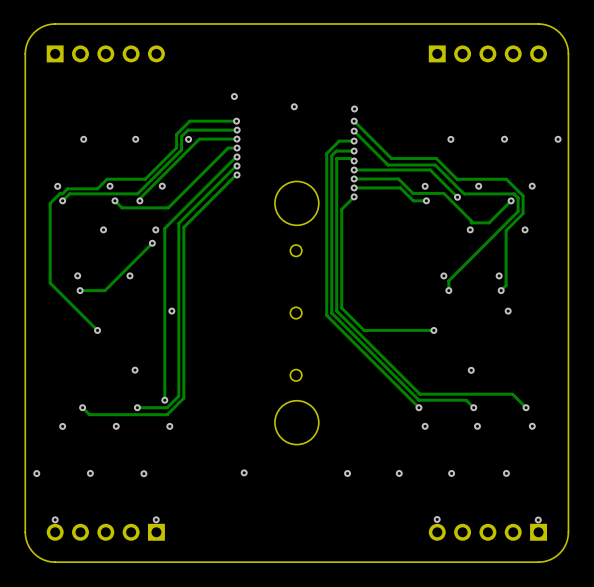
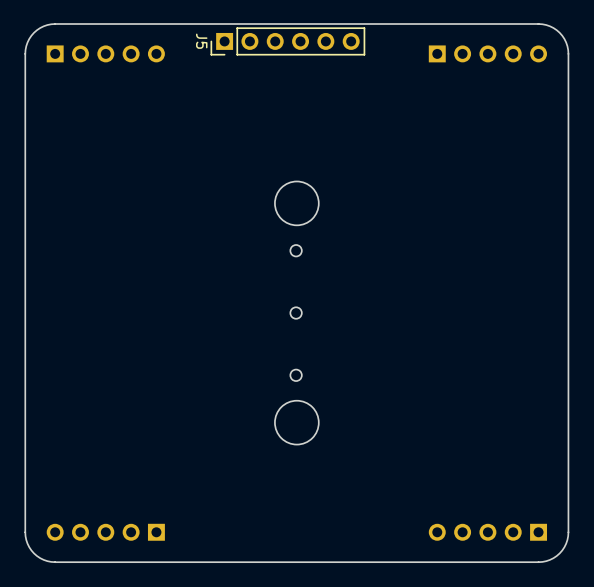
J5: none -> (287, 41)
via: (234, 96) -> none
via: (294, 106) -> none
via: (354, 108) -> none
track: (236, 121) (189, 121) (176, 134) (176, 147) (145, 179) (107, 179) (97, 188) (67, 188) (50, 203) (50, 283) (97, 330) -> none
via: (236, 121) -> none
track: (354, 121) (391, 158) (436, 158) (457, 179) (506, 179) (523, 195) (523, 213) (506, 230) (506, 285) (501, 290) -> none
via: (354, 121) -> none
track: (237, 130) (187, 130) (181, 136) (181, 149) (137, 193) (69, 193) (62, 200) -> none
via: (237, 130) -> none
track: (354, 131) (388, 165) (435, 165) (464, 193) (514, 193) (518, 198) (518, 211) (448, 280) (448, 290) -> none
via: (354, 131) -> none
via: (83, 139) -> none
via: (135, 139) -> none
via: (188, 139) -> none
track: (237, 139) (199, 139) (139, 198) (139, 200) -> none
via: (237, 139) -> none
via: (450, 139) -> none
via: (504, 139) -> none
via: (558, 139) -> none
track: (354, 141) (339, 141) (326, 153) (326, 315) (418, 407) -> none
via: (354, 141) -> none
track: (237, 148) (228, 148) (168, 207) (122, 207) (114, 200) -> none
via: (237, 148) -> none
track: (354, 151) (336, 151) (331, 155) (331, 313) (418, 400) (466, 400) (473, 407) -> none
via: (354, 151) -> none
track: (237, 157) (164, 228) (164, 400) -> none
via: (237, 157) -> none
track: (354, 161) (350, 158) (336, 158) (336, 310) (419, 394) (512, 394) (526, 407) -> none
via: (354, 161) -> none
track: (237, 166) (178, 223) (178, 396) (167, 407) (137, 407) -> none
via: (237, 166) -> none
track: (354, 170) (430, 170) (457, 197) -> none
via: (354, 170) -> none
track: (237, 174) (183, 227) (183, 398) (167, 414) (89, 414) (82, 407) -> none
via: (237, 174) -> none
track: (354, 178) (398, 178) (413, 193) (443, 193) (471, 222) (489, 222) (511, 200) -> none
via: (354, 178) -> none
via: (57, 186) -> none
via: (110, 186) -> none
via: (162, 186) -> none
via: (425, 186) -> none
via: (478, 186) -> none
via: (532, 186) -> none
track: (354, 187) (400, 187) (413, 200) (426, 200) -> none
via: (354, 187) -> none
track: (354, 196) (341, 209) (341, 308) (364, 330) (433, 330) -> none
via: (354, 196) -> none
via: (457, 197) -> none
via: (62, 200) -> none
via: (114, 200) -> none
via: (139, 200) -> none
via: (426, 200) -> none
via: (511, 200) -> none
via: (103, 229) -> none
via: (155, 229) -> none
via: (470, 229) -> none
via: (525, 229) -> none
track: (152, 243) (105, 290) (80, 290) -> none
via: (152, 243) -> none
via: (77, 275) -> none
via: (129, 275) -> none
via: (443, 275) -> none
via: (499, 275) -> none
via: (80, 290) -> none
via: (448, 290) -> none
via: (501, 290) -> none
via: (171, 311) -> none
via: (508, 311) -> none
via: (97, 330) -> none
via: (433, 330) -> none
via: (135, 370) -> none
via: (471, 370) -> none
via: (164, 400) -> none
via: (82, 407) -> none
via: (137, 407) -> none
via: (418, 407) -> none
via: (473, 407) -> none
via: (526, 407) -> none
via: (62, 426) -> none
via: (116, 426) -> none
via: (169, 426) -> none
via: (425, 426) -> none
via: (477, 426) -> none
via: (532, 426) -> none
via: (244, 472) -> none
via: (36, 473) -> none
via: (90, 473) -> none
via: (143, 473) -> none
via: (347, 473) -> none
via: (399, 473) -> none
via: (451, 473) -> none
via: (506, 473) -> none
via: (55, 519) -> none
via: (156, 519) -> none
via: (437, 519) -> none
via: (538, 519) -> none

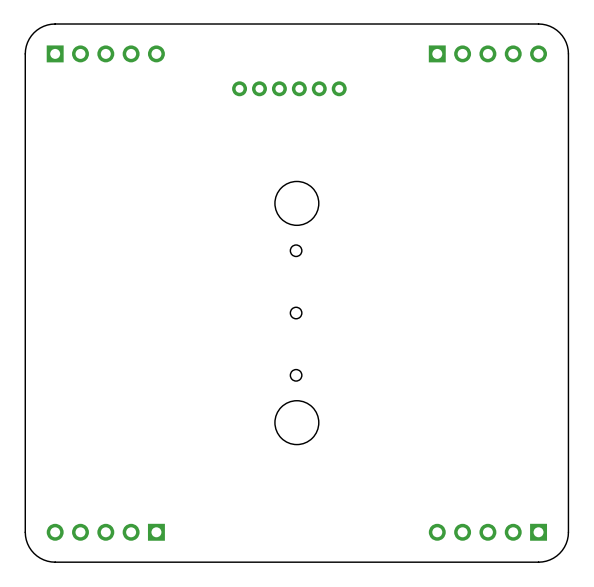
J5: (287, 41) -> none
part: none -> (289, 88)

